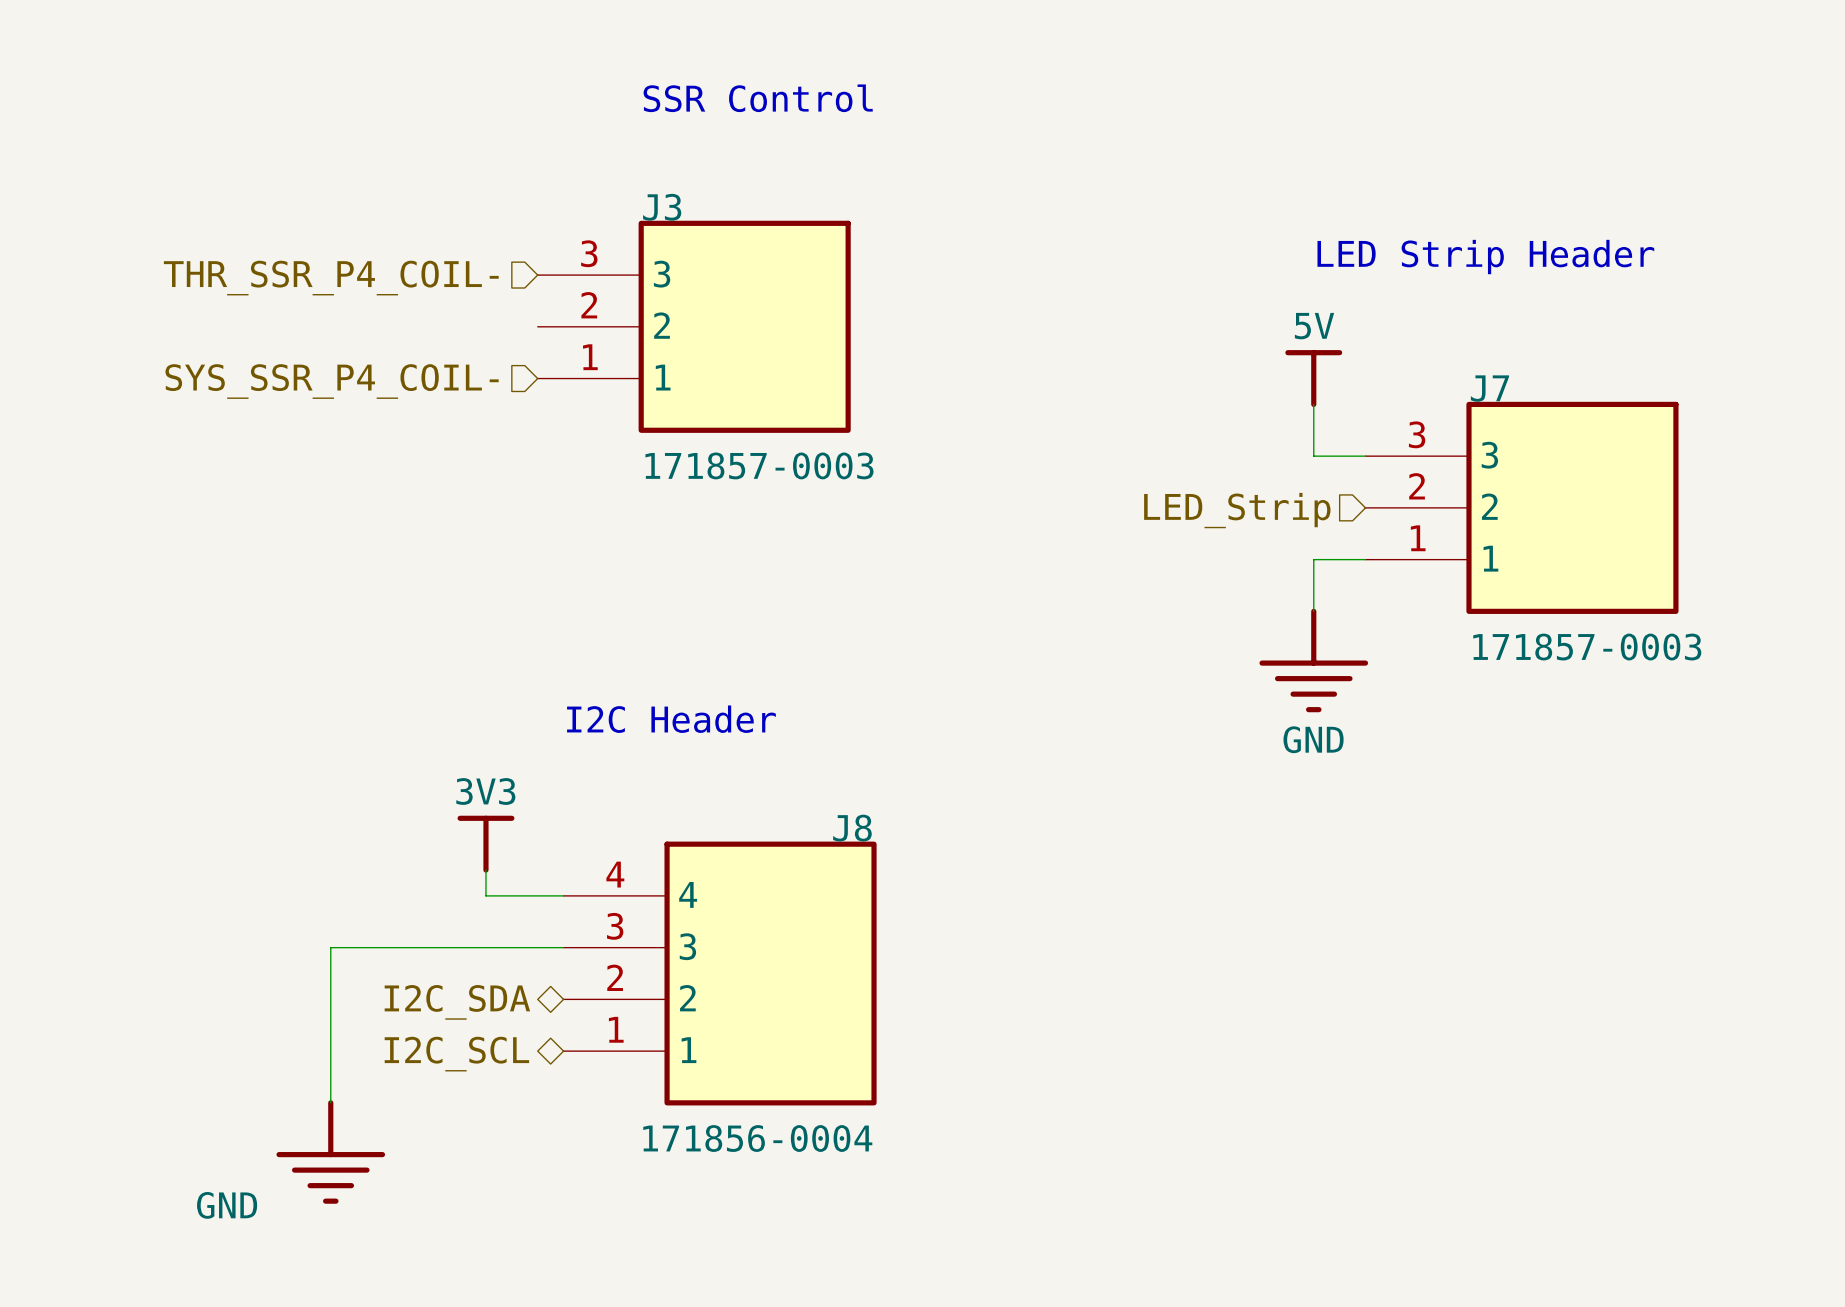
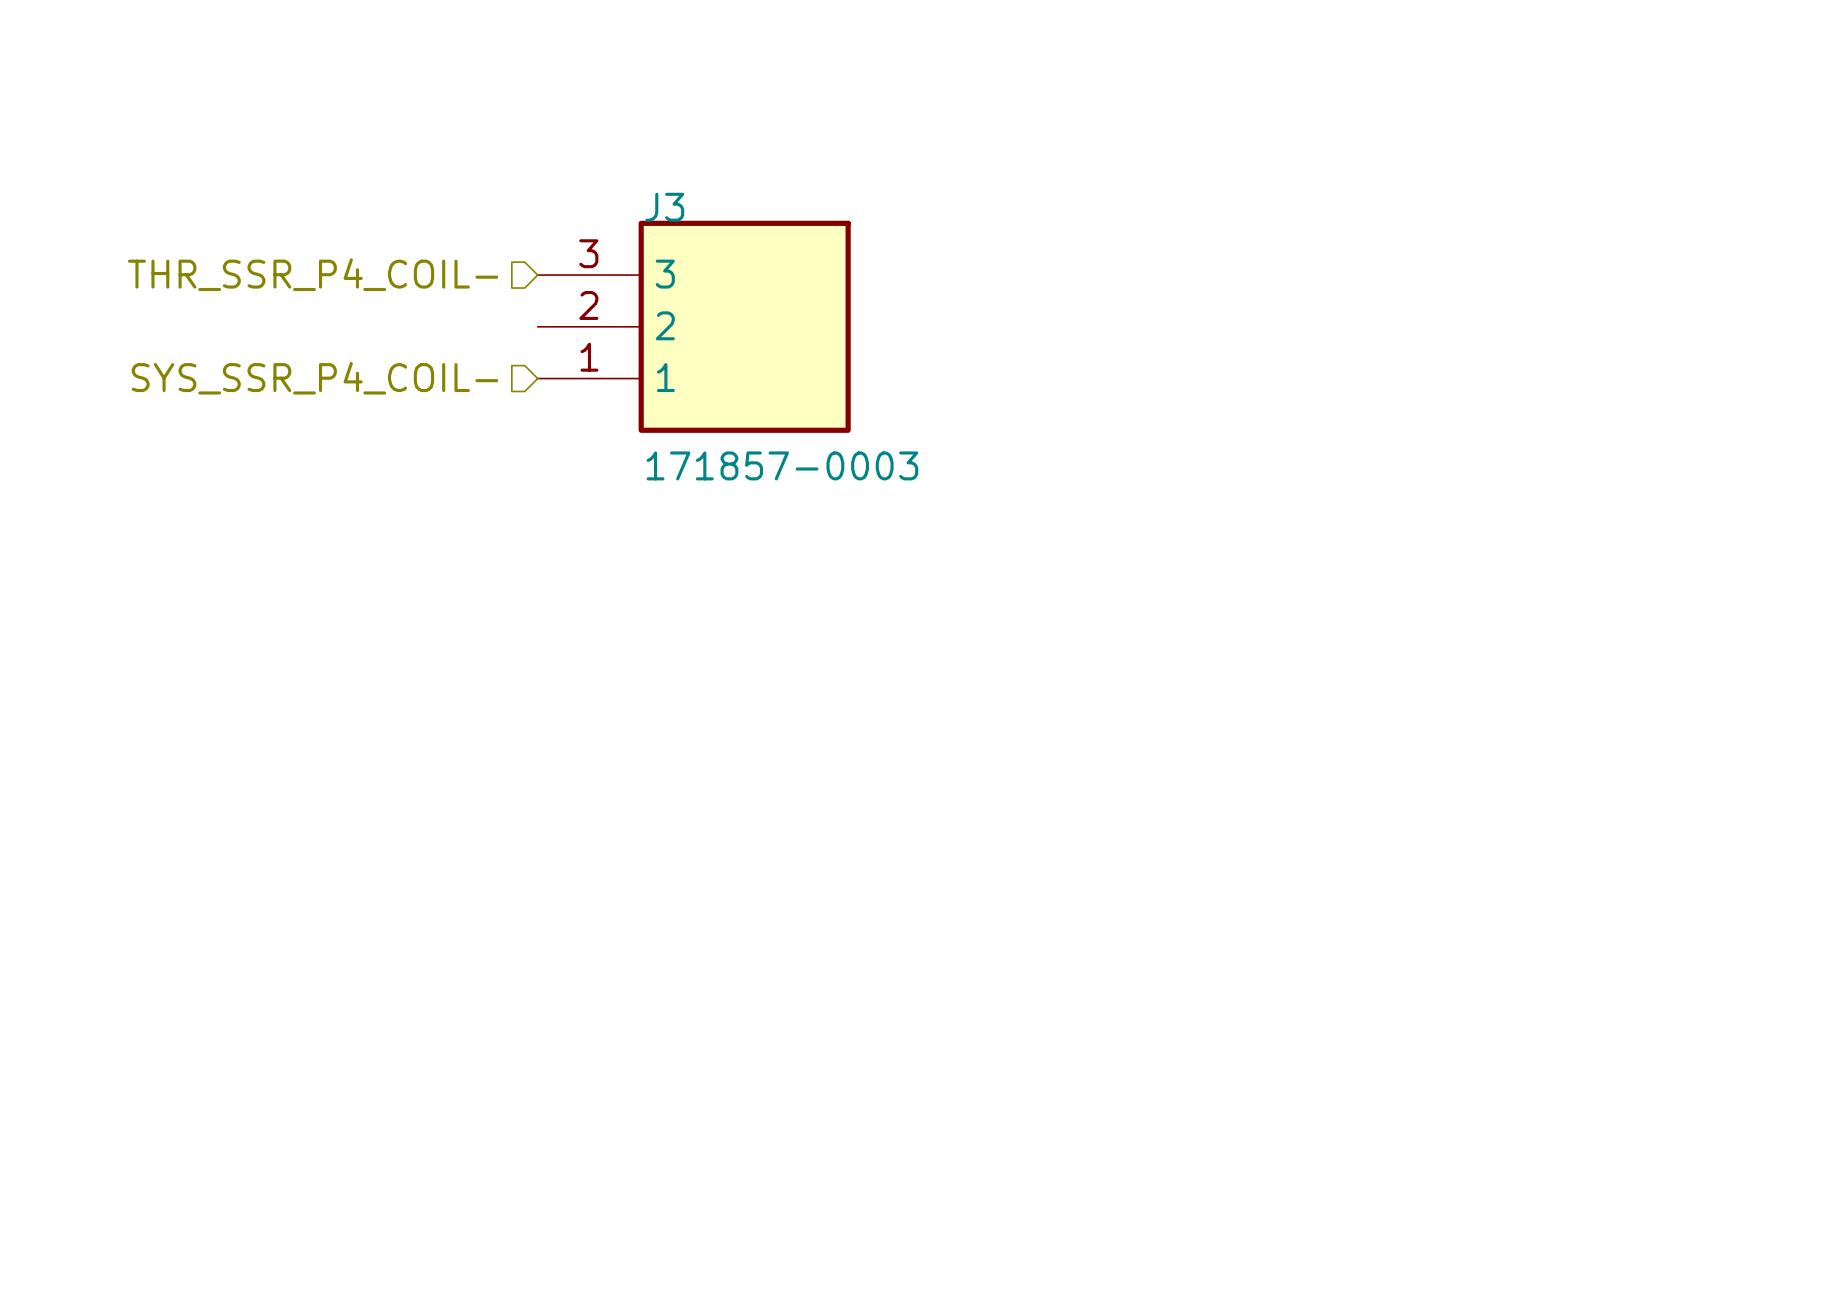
text: SSR Control (758, 98) -> none
text: LED Strip Header (1485, 257) -> none
power symbol: 5V (1313, 378) -> none
wire: (1313, 404) (1313, 456) (1365, 456) -> none
J7: 171857-0003 (1522, 507) -> none
hierarchical label: LED_Strip (1237, 510) -> none
wire: (1365, 559) (1313, 559) (1313, 611) -> none
power symbol: GND (1313, 660) -> none
text: I2C Header (671, 719) -> none
power symbol: 3V3 (485, 844) -> none
wire: (485, 870) (485, 895) (563, 895) -> none
wire: (563, 947) (330, 947) (330, 1102) -> none
J8: 171856-0004 (720, 973) -> none
hierarchical label: I2C_SDA (457, 1002) -> none
hierarchical label: I2C_SCL (456, 1054) -> none
power symbol: GND (330, 1152) -> none

